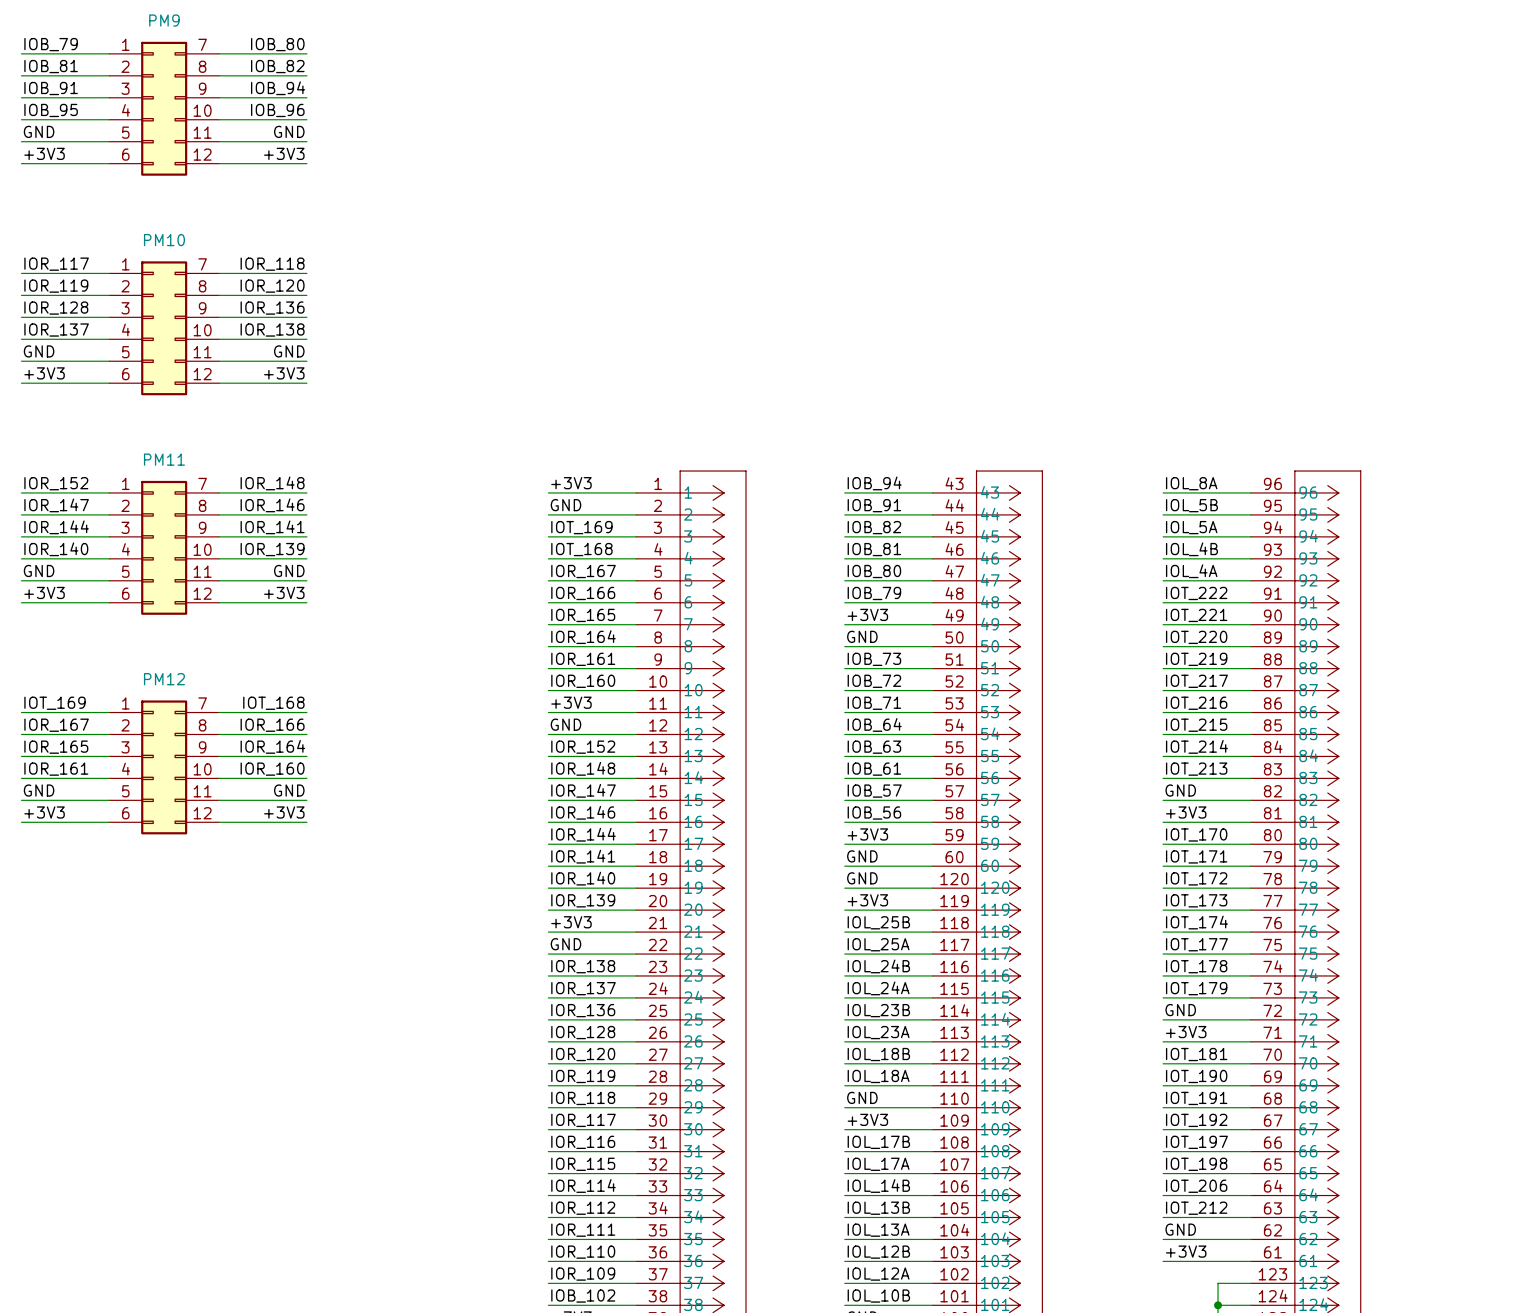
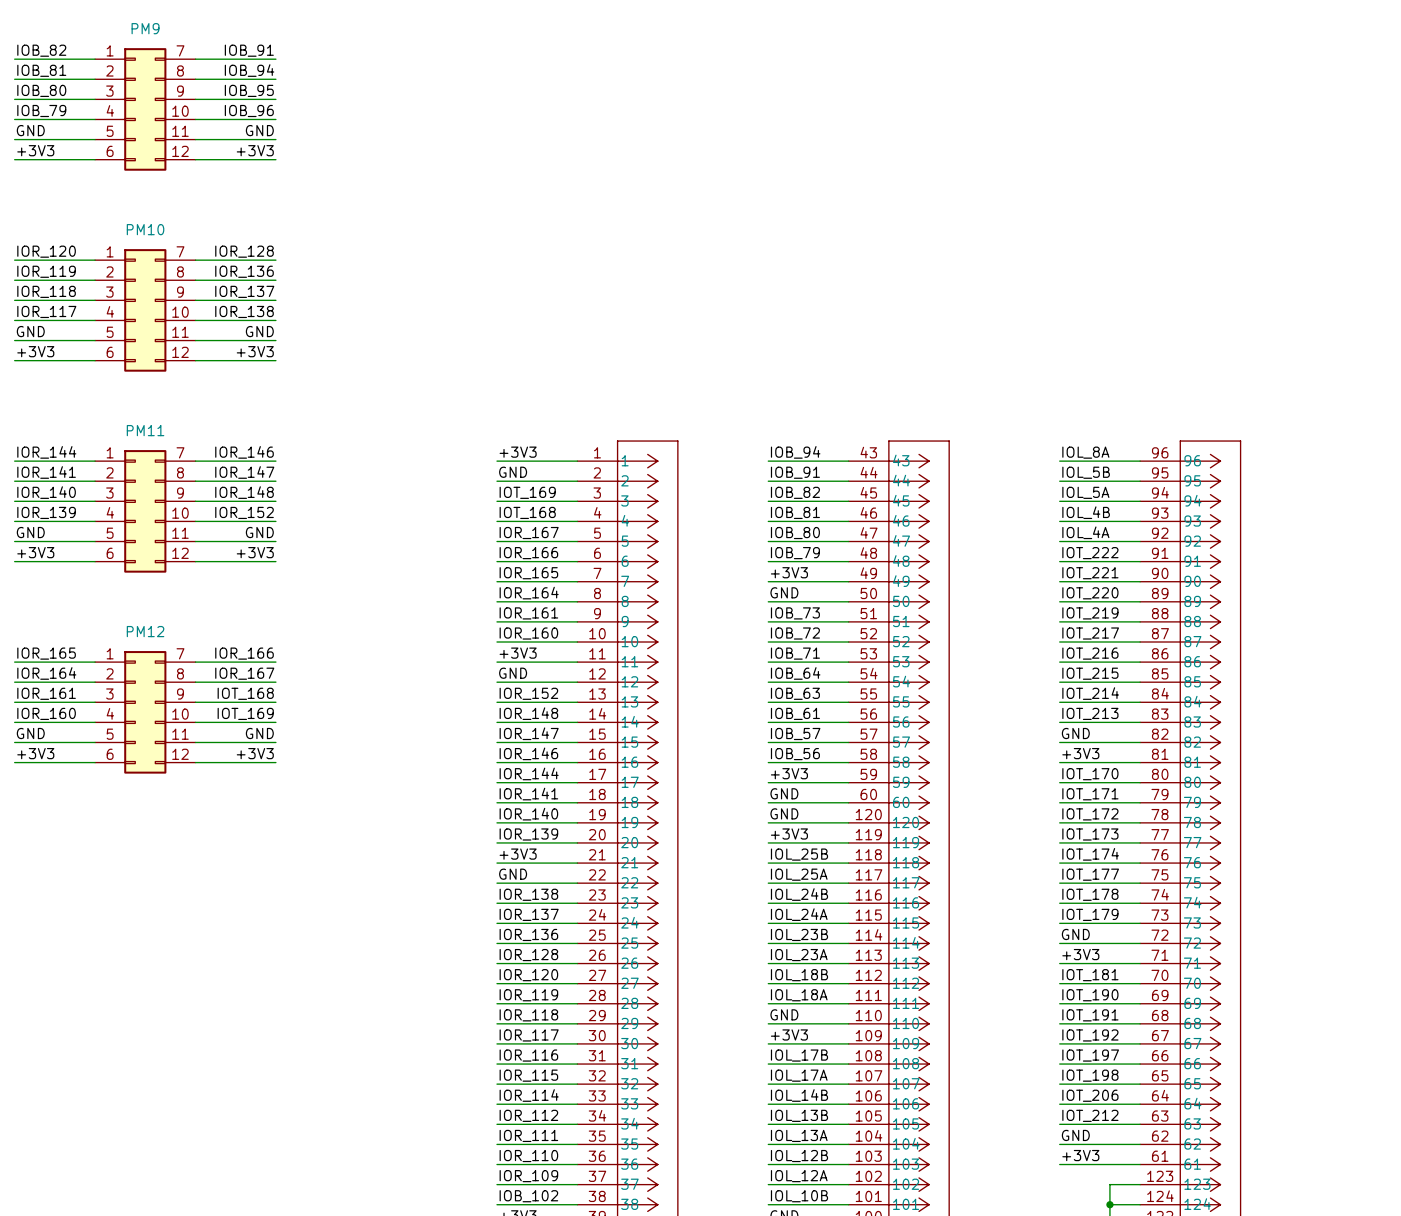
label: IOB_79 (51, 44) -> IOB_82 (41, 50)
label: IOB_80 (277, 44) -> IOB_91 (249, 50)
label: IOB_82 (277, 66) -> IOB_94 (249, 70)
label: IOB_91 (51, 88) -> IOB_80 (41, 90)
label: IOB_94 (278, 88) -> IOB_95 (249, 90)
label: IOB_95 (51, 110) -> IOB_79 (41, 110)
label: IOR_117 (56, 264) -> IOR_120 (46, 251)
label: IOR_118 (272, 264) -> IOR_128 (244, 251)
label: IOR_120 (272, 286) -> IOR_136 (244, 271)
label: IOR_128 (56, 308) -> IOR_118 (46, 291)
label: IOR_136 (272, 308) -> IOR_137 (244, 291)
label: IOR_137 (56, 330) -> IOR_117 (46, 311)
label: IOR_152 (56, 483) -> IOR_144 (46, 452)
label: IOR_148 (272, 483) -> IOR_146 (244, 452)
label: IOR_147 (56, 505) -> IOR_141 (46, 472)
label: IOR_146 (272, 505) -> IOR_147 (244, 472)
label: IOR_144 (56, 527) -> IOR_140 (46, 492)
label: IOR_141 (272, 527) -> IOR_148 (244, 492)
label: IOR_140 (56, 549) -> IOR_139 (46, 512)
label: IOR_139 (272, 549) -> IOR_152 (244, 512)
label: IOT_169 (55, 703) -> IOR_165 (46, 653)
label: IOT_168 (273, 703) -> IOR_166 (244, 653)
label: IOR_167 (56, 725) -> IOR_164 (46, 673)
label: IOR_166 (272, 725) -> IOR_167 (244, 673)
label: IOR_164 (272, 746) -> IOT_168 (245, 693)
label: IOR_165 (56, 747) -> IOR_161 (46, 693)
label: IOR_161 (56, 769) -> IOR_160 (46, 713)
label: IOR_160 (272, 769) -> IOT_169 (245, 713)

